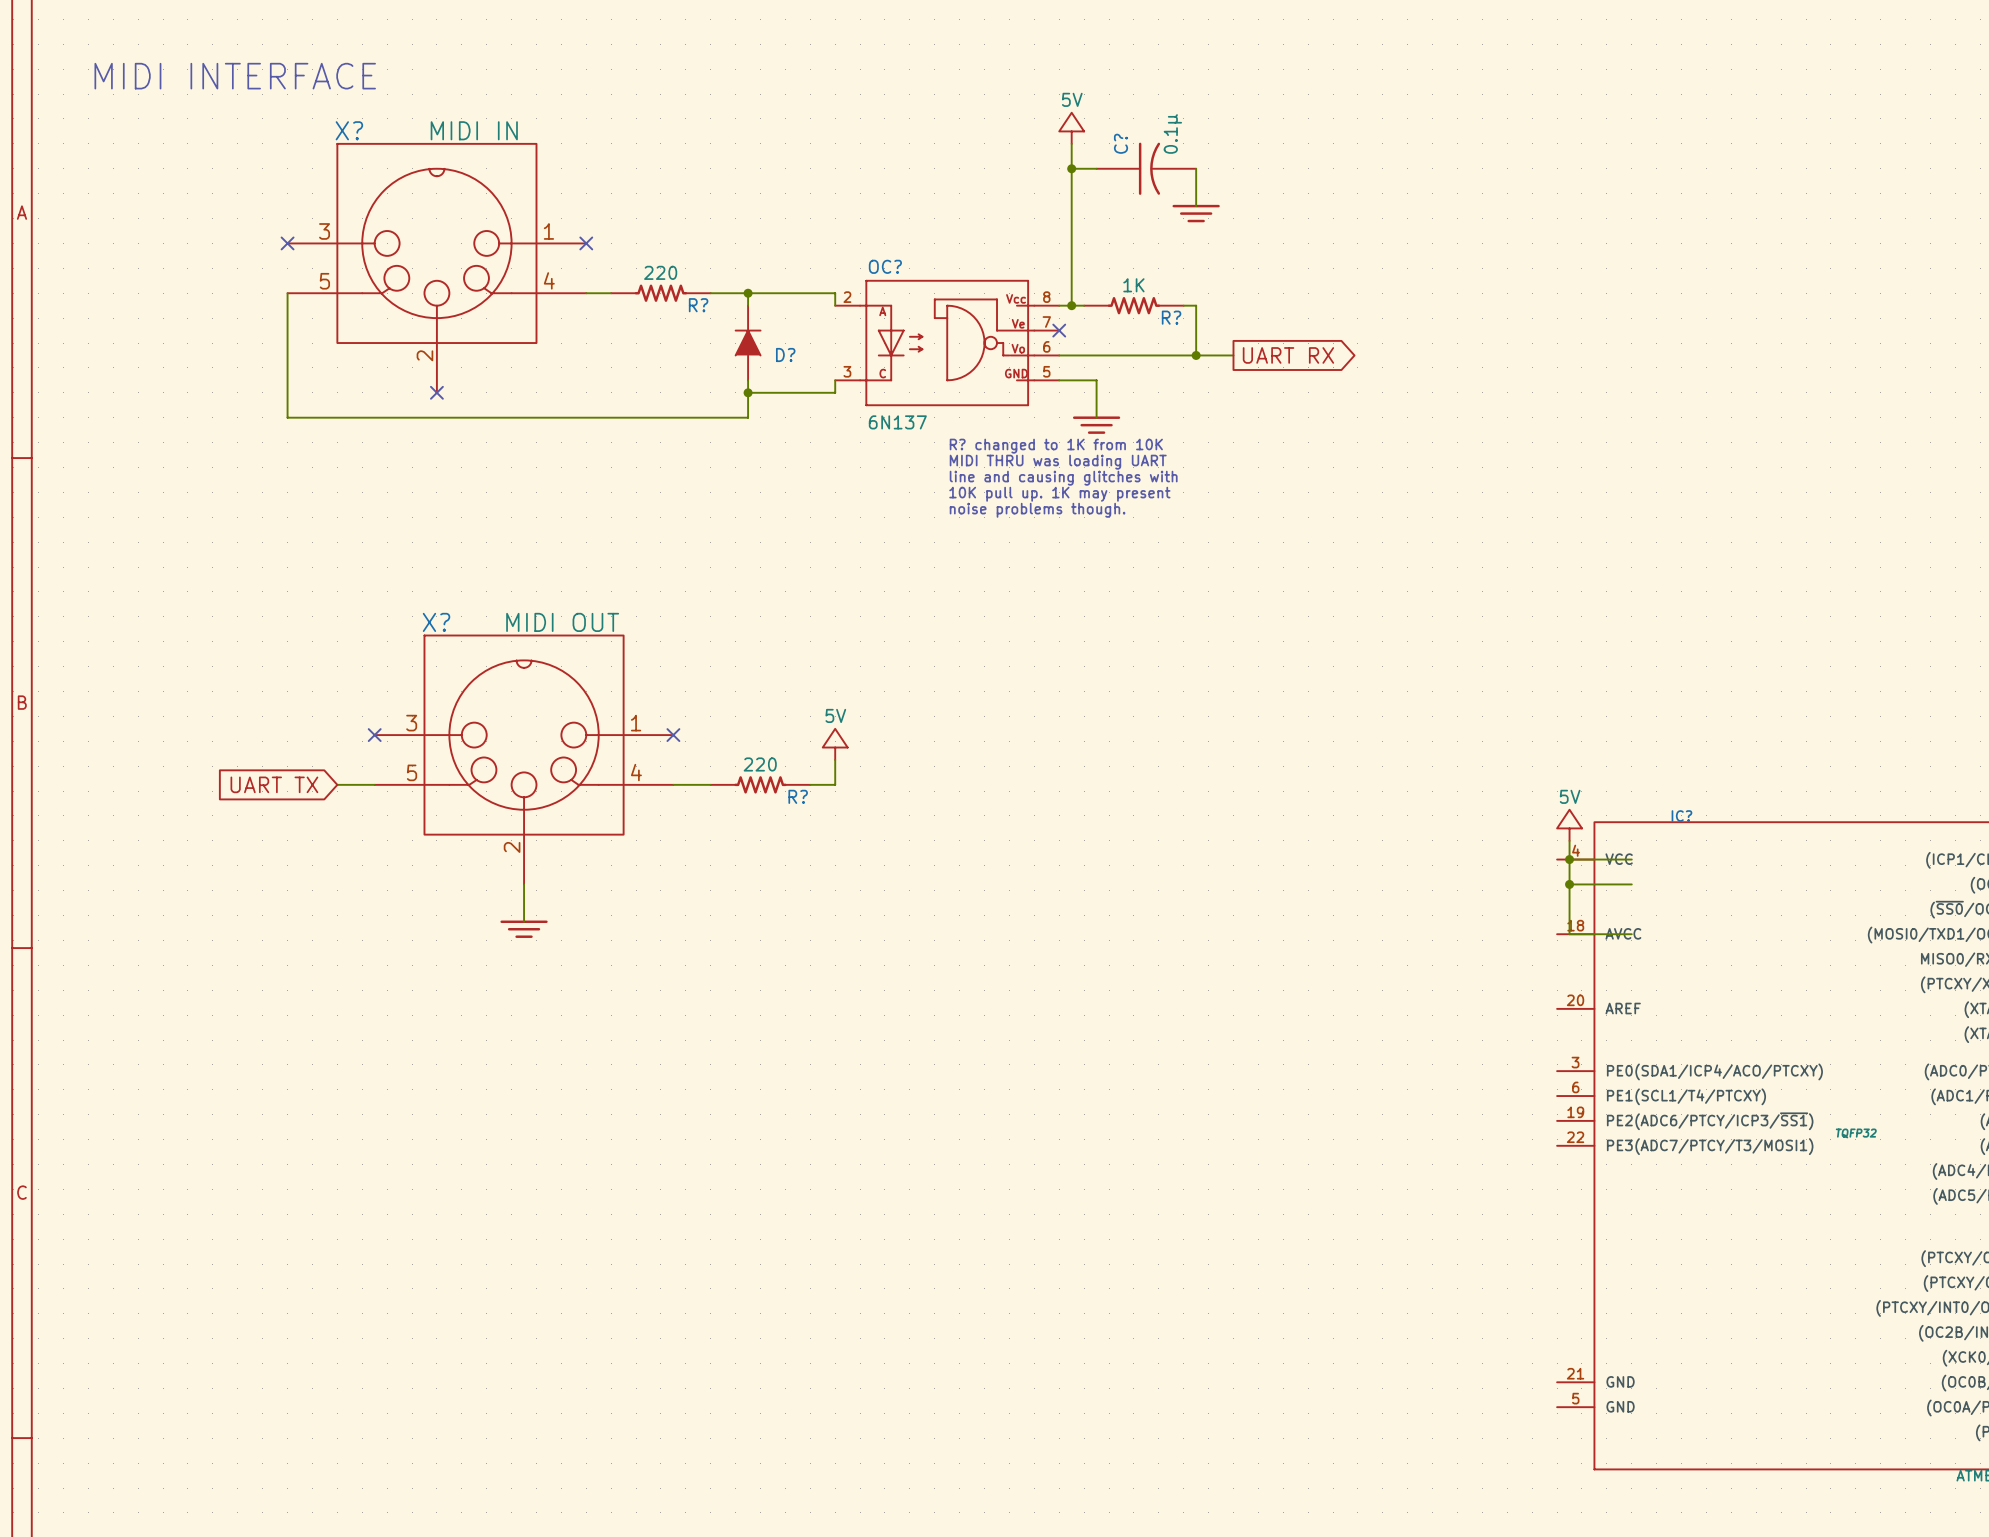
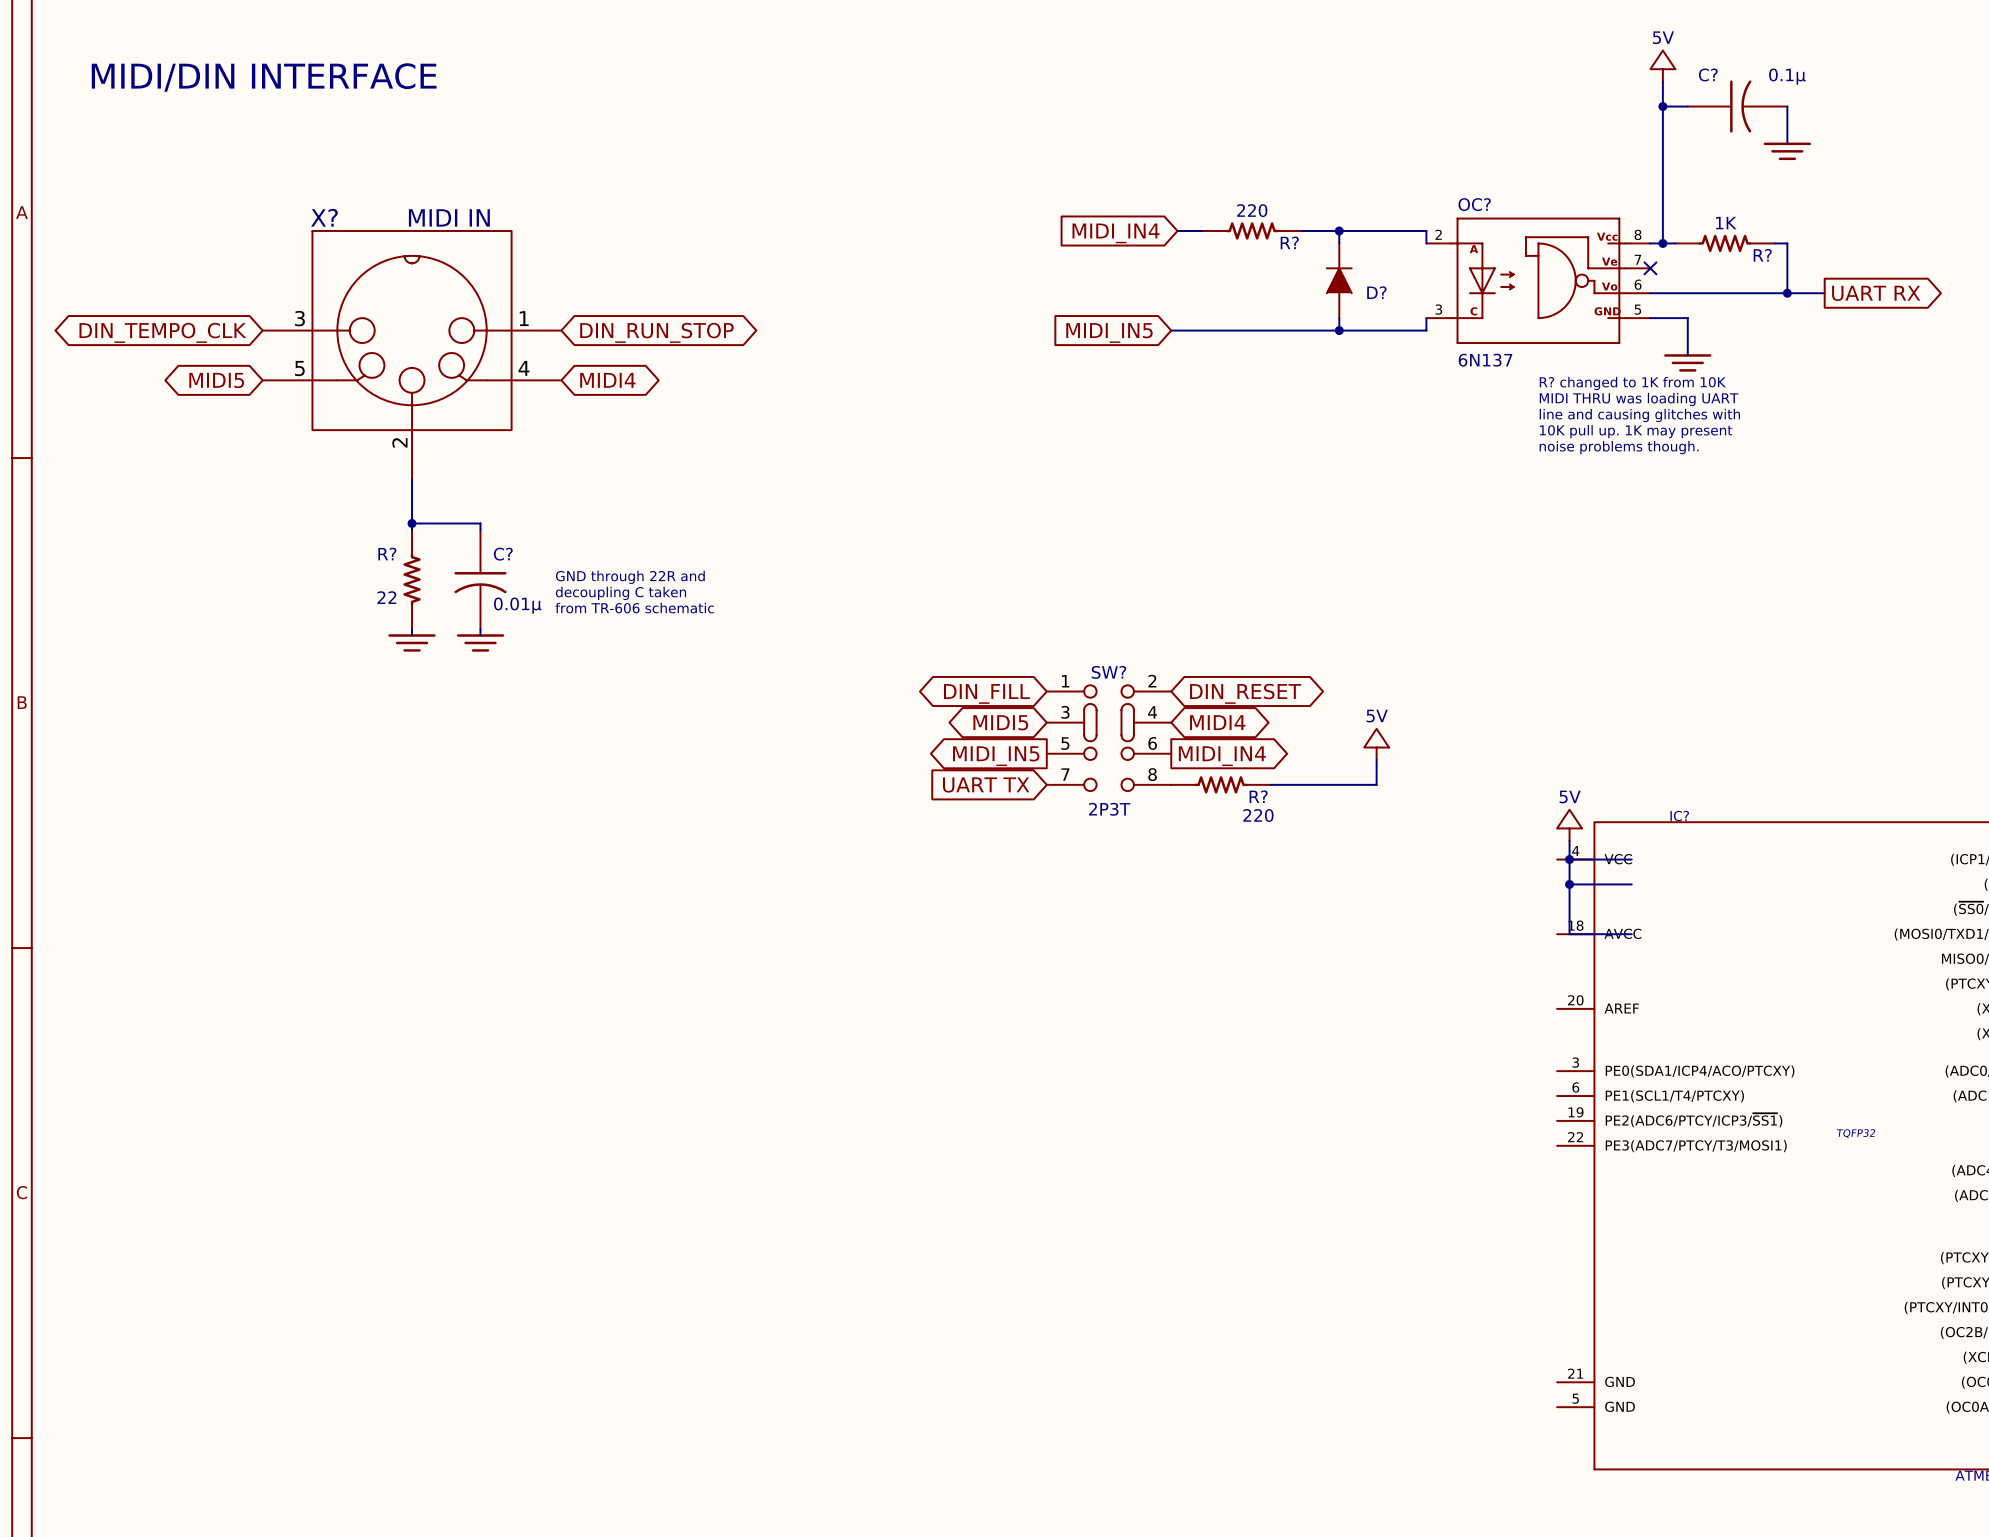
power symbol: none -> 5V (1662, 66)
text: MIDI INTERFACE (235, 76) -> MIDI/DIN INTERFACE (264, 77)
wire: none -> (1662, 81) (1662, 243)
wire: none -> (1662, 106) (1687, 106)
junction: none -> (1662, 106)
C?: none -> 0.1µ (1737, 106)
wire: none -> (1787, 106) (1787, 143)
power symbol: 5V (1071, 128) -> none
wire: (1071, 143) (1071, 305) -> none
power symbol: none -> (1787, 151)
wire: (1071, 168) (1096, 168) -> (1177, 230) (1202, 230)
junction: (1071, 168) -> none
C?: 0.1µ (1146, 168) -> none
wire: (1196, 168) (1196, 206) -> none
power symbol: (1196, 213) -> none
R?: none -> 220 (1252, 230)
wire: none -> (1301, 230) (1426, 230) (1426, 243)
wire: none -> (1339, 230) (1339, 243)
junction: none -> (1339, 230)
global label: none -> MIDI_IN4 (1116, 233)
no-connect mark: (287, 243) -> none
no-connect mark: (586, 243) -> none
wire: none -> (1650, 243) (1675, 243)
junction: none -> (1662, 243)
R?: none -> 1K (1725, 243)
wire: none -> (1774, 243) (1787, 243) (1787, 293)
X? position: (436, 268) -> (412, 355)
no-connect mark: none -> (1650, 268)
D?: none -> (1339, 280)
OC?: none -> 6N137 (1538, 280)
wire: (287, 293) (287, 417) (748, 417) (748, 380) -> none
wire: (586, 293) (611, 293) -> none
R?: 220 (660, 293) -> none
wire: (710, 293) (835, 293) (835, 305) -> none
wire: (748, 293) (748, 305) -> none
junction: (748, 293) -> none
wire: none -> (1650, 293) (1824, 293)
junction: none -> (1787, 293)
global label: none -> UART RX (1876, 293)
wire: (1059, 305) (1084, 305) -> none
junction: (1071, 305) -> none
R?: 1K (1133, 305) -> none
wire: (1183, 305) (1196, 305) (1196, 355) -> none
wire: none -> (1339, 318) (1339, 330)
wire: none -> (1426, 318) (1426, 330) (1171, 330)
wire: none -> (1650, 318) (1687, 318) (1687, 355)
no-connect mark: (1059, 330) -> none
junction: none -> (1339, 330)
global label: none -> DIN_TEMPO_CLK (162, 332)
global label: none -> DIN_RUN_STOP (656, 332)
global label: none -> MIDI_IN5 (1109, 332)
D?: (748, 343) -> none
OC?: 6N137 (947, 343) -> none
wire: (1059, 355) (1233, 355) -> none
junction: (1196, 355) -> none
global label: UART RX (1288, 355) -> none
power symbol: none -> (1687, 362)
global label: none -> MIDI5 (216, 380)
global label: none -> MIDI4 (607, 380)
wire: (835, 380) (835, 392) (748, 392) -> none
wire: (1059, 380) (1096, 380) (1096, 417) -> none
text: none -> R? changed to 1K from 10K (1632, 383)
no-connect mark: (436, 392) -> none
junction: (748, 392) -> none
text: none -> MIDI THRU was loading UART (1639, 399)
text: none -> line and causing glitches with (1639, 415)
power symbol: (1096, 425) -> none
text: none -> 10K pull up. 1K may present (1636, 431)
text: R? changed to 1K from 10K (1056, 446) -> none
text: none -> noise problems though. (1619, 447)
text: MIDI THRU was loading UART (1058, 462) -> none
text: line and causing glitches with (1063, 478) -> none
wire: none -> (412, 479) (412, 529)
text: 10K pull up. 1K may present (1059, 494) -> none
text: noise problems though. (1037, 510) -> none
wire: none -> (412, 523) (480, 523) (480, 529)
junction: none -> (412, 523)
text: none -> GND through 22R and (630, 577)
R?: none -> 22 (412, 579)
C?: none -> 0.01µ (480, 579)
text: none -> decoupling C taken (621, 593)
text: none -> from TR-606 schematic (634, 608)
wire: none -> (412, 629) (412, 635)
wire: none -> (480, 629) (480, 635)
power symbol: none -> (412, 642)
power symbol: none -> (480, 642)
global label: none -> DIN_FILL (986, 693)
global label: none -> DIN_RESET (1245, 693)
global label: none -> MIDI5 (1000, 722)
global label: none -> MIDI4 (1217, 722)
no-connect mark: (374, 735) -> none
no-connect mark: (673, 735) -> none
SW?: none -> 2P3T (1109, 738)
power symbol: 5V (835, 744) -> none
power symbol: none -> 5V (1376, 744)
global label: none -> MIDI_IN5 (996, 756)
global label: none -> MIDI_IN4 (1222, 756)
X?: MIDI OUT (524, 759) -> none
wire: (835, 759) (835, 784) (810, 784) -> none
wire: none -> (1376, 759) (1376, 784) (1270, 784)
global label: UART TX (274, 784) -> none
wire: (337, 784) (374, 784) -> none
wire: (673, 784) (710, 784) -> none
R?: 220 (760, 784) -> none
global label: none -> UART TX (986, 785)
R?: none -> 220 (1221, 784)
wire: (524, 884) (524, 921) -> none
power symbol: (524, 929) -> none

